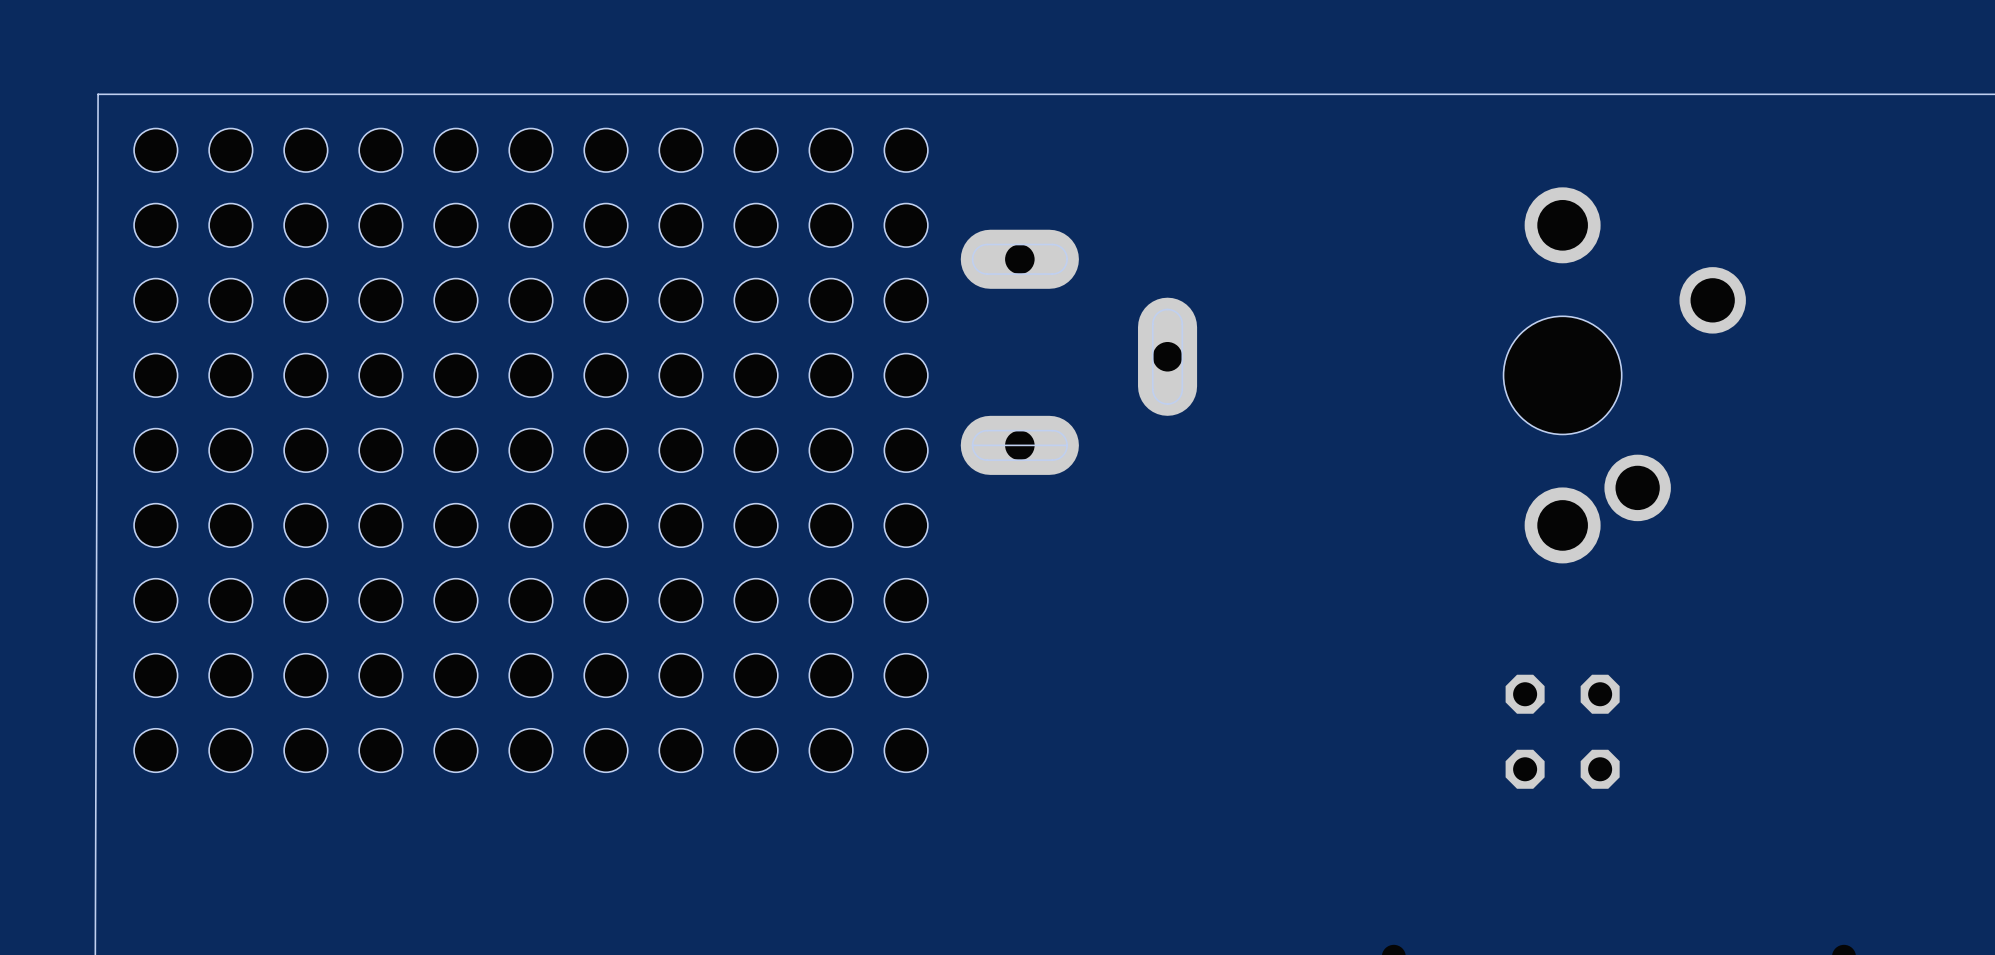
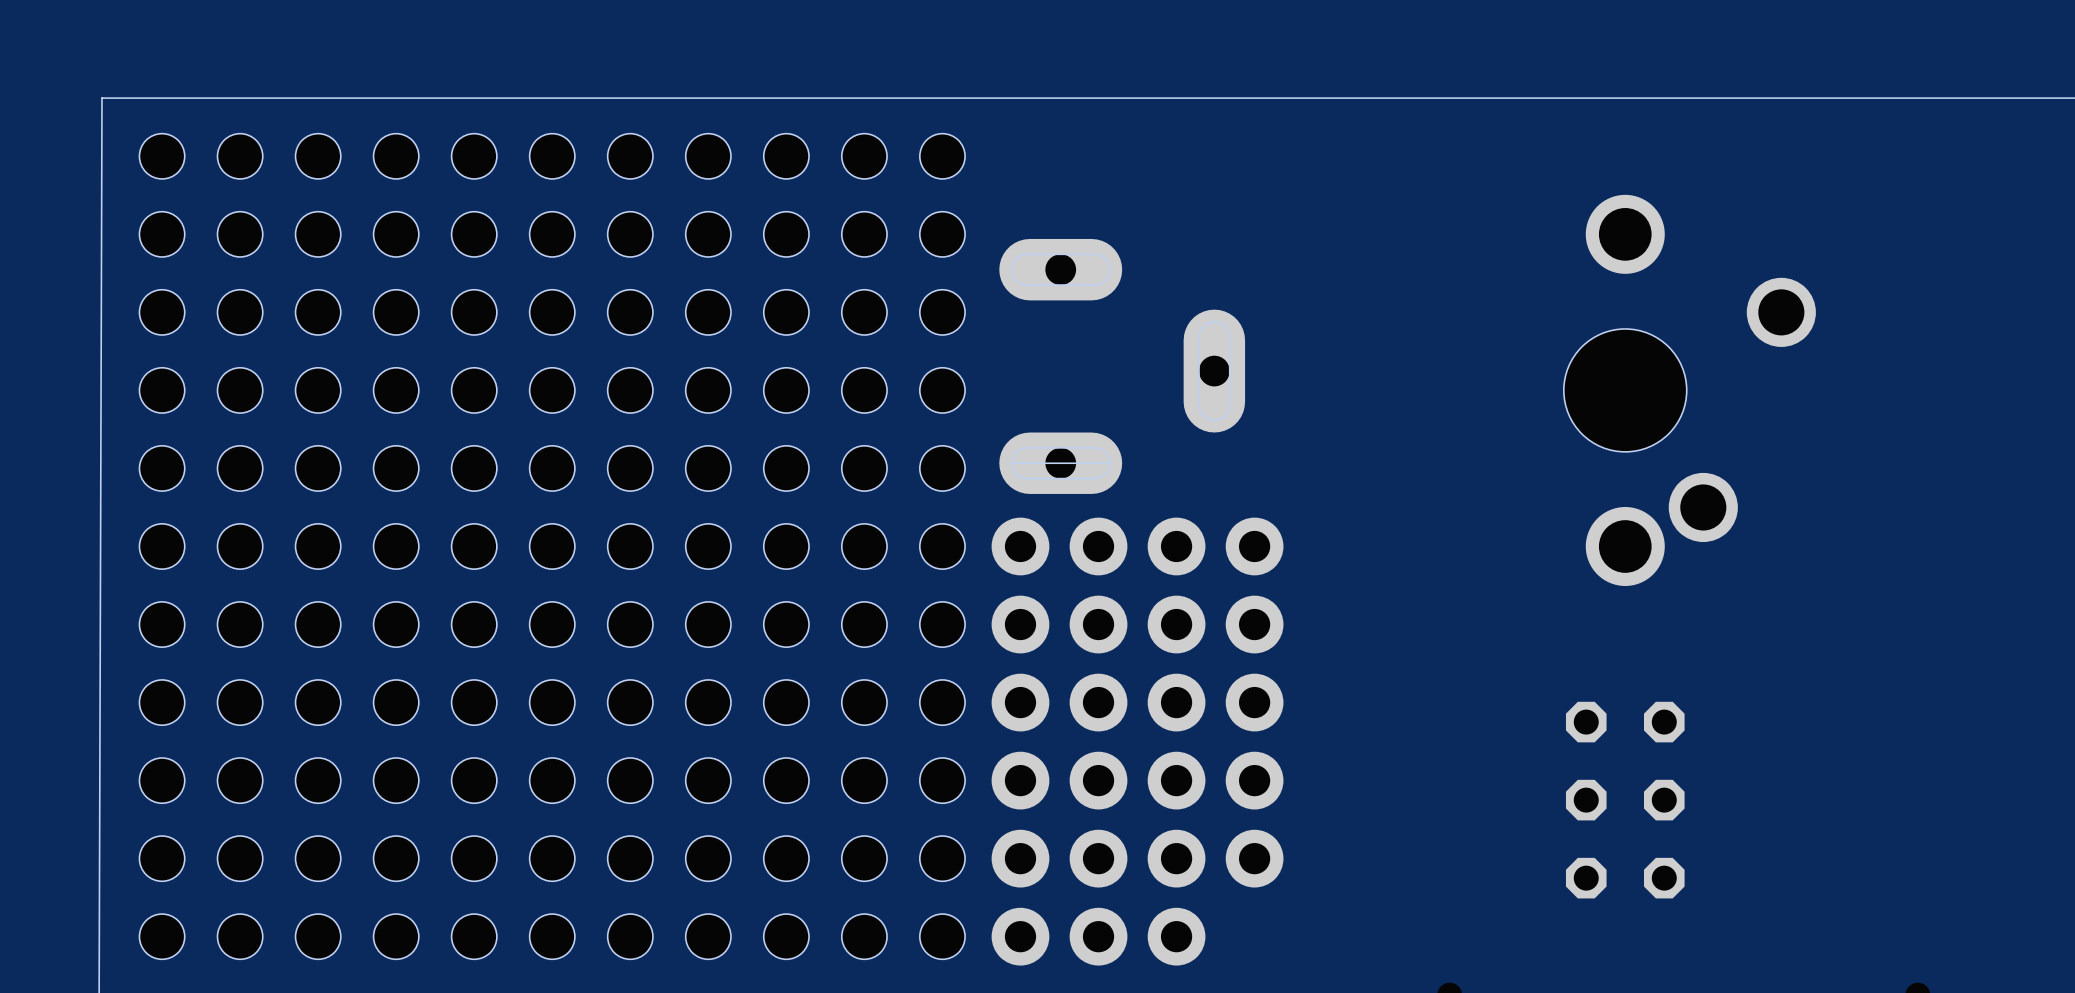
part: none -> (1254, 702)
part: none -> (1020, 741)
part: none -> (1098, 741)
part: none -> (1176, 741)
part: none -> (552, 858)
part: none -> (1625, 878)
part: none -> (552, 936)

